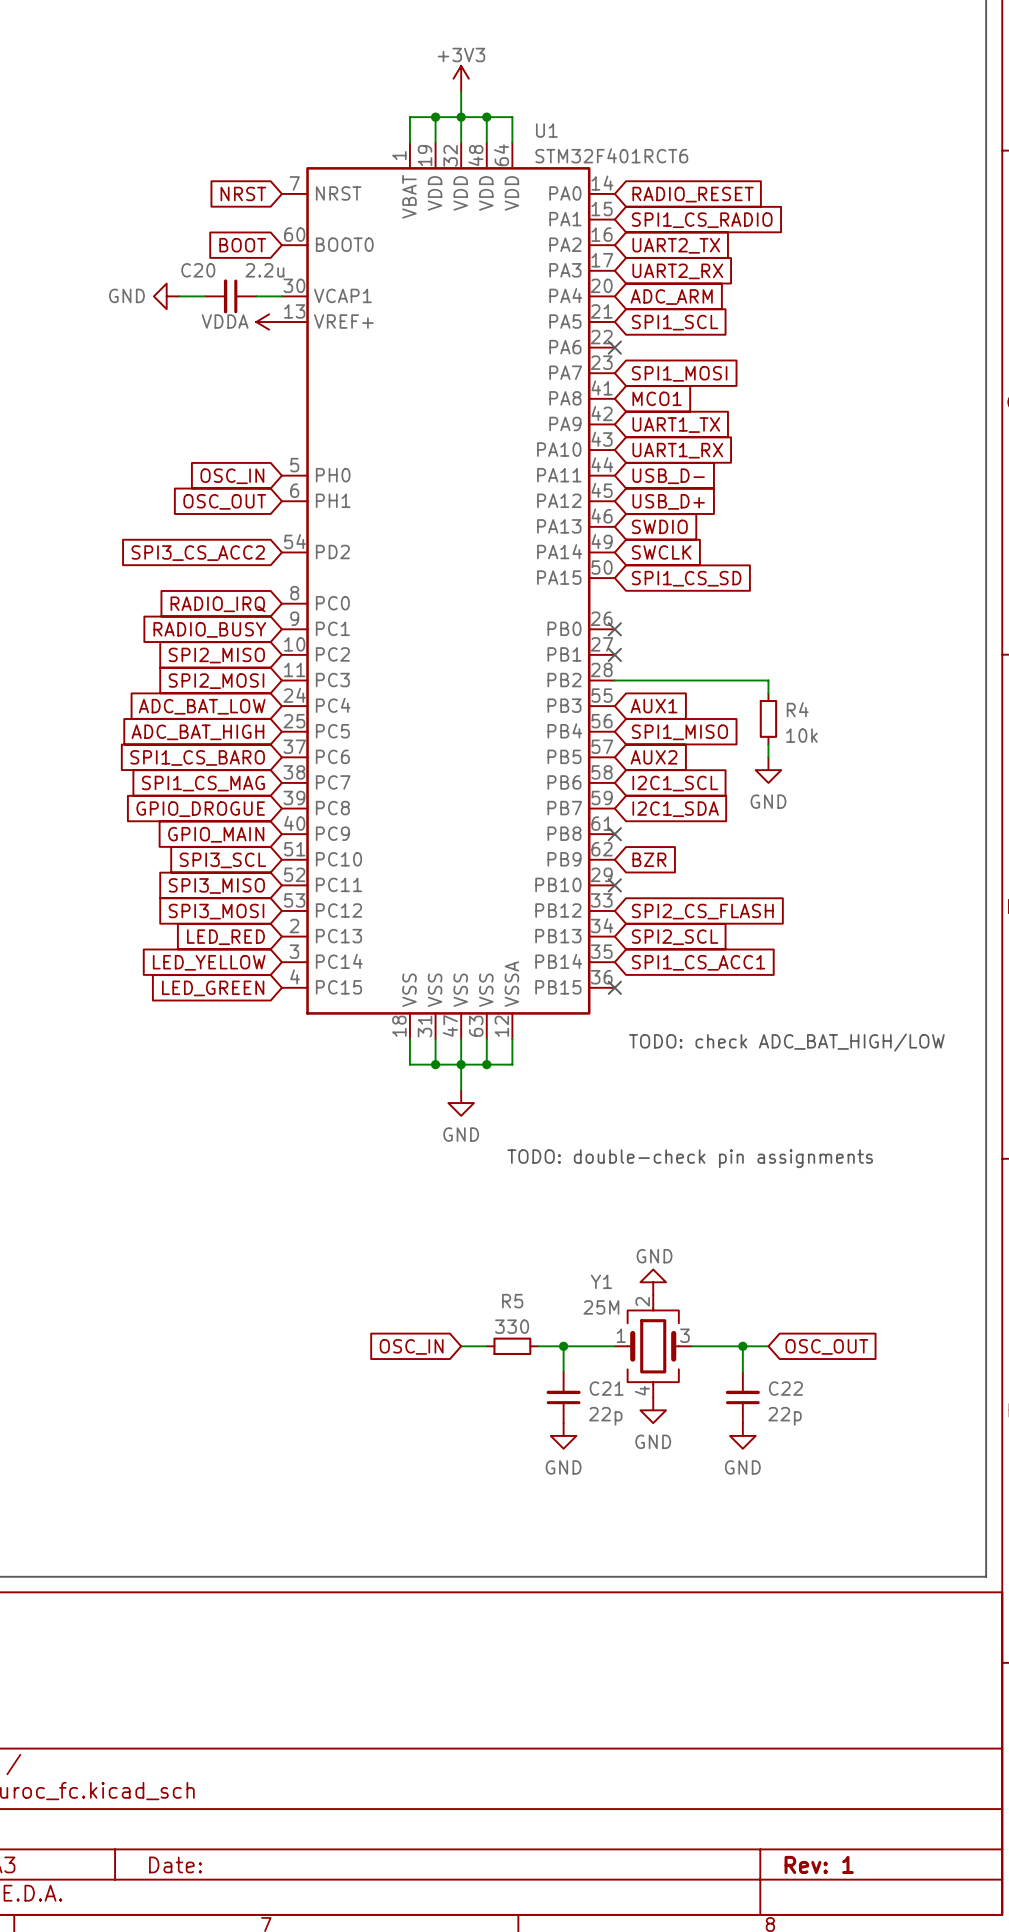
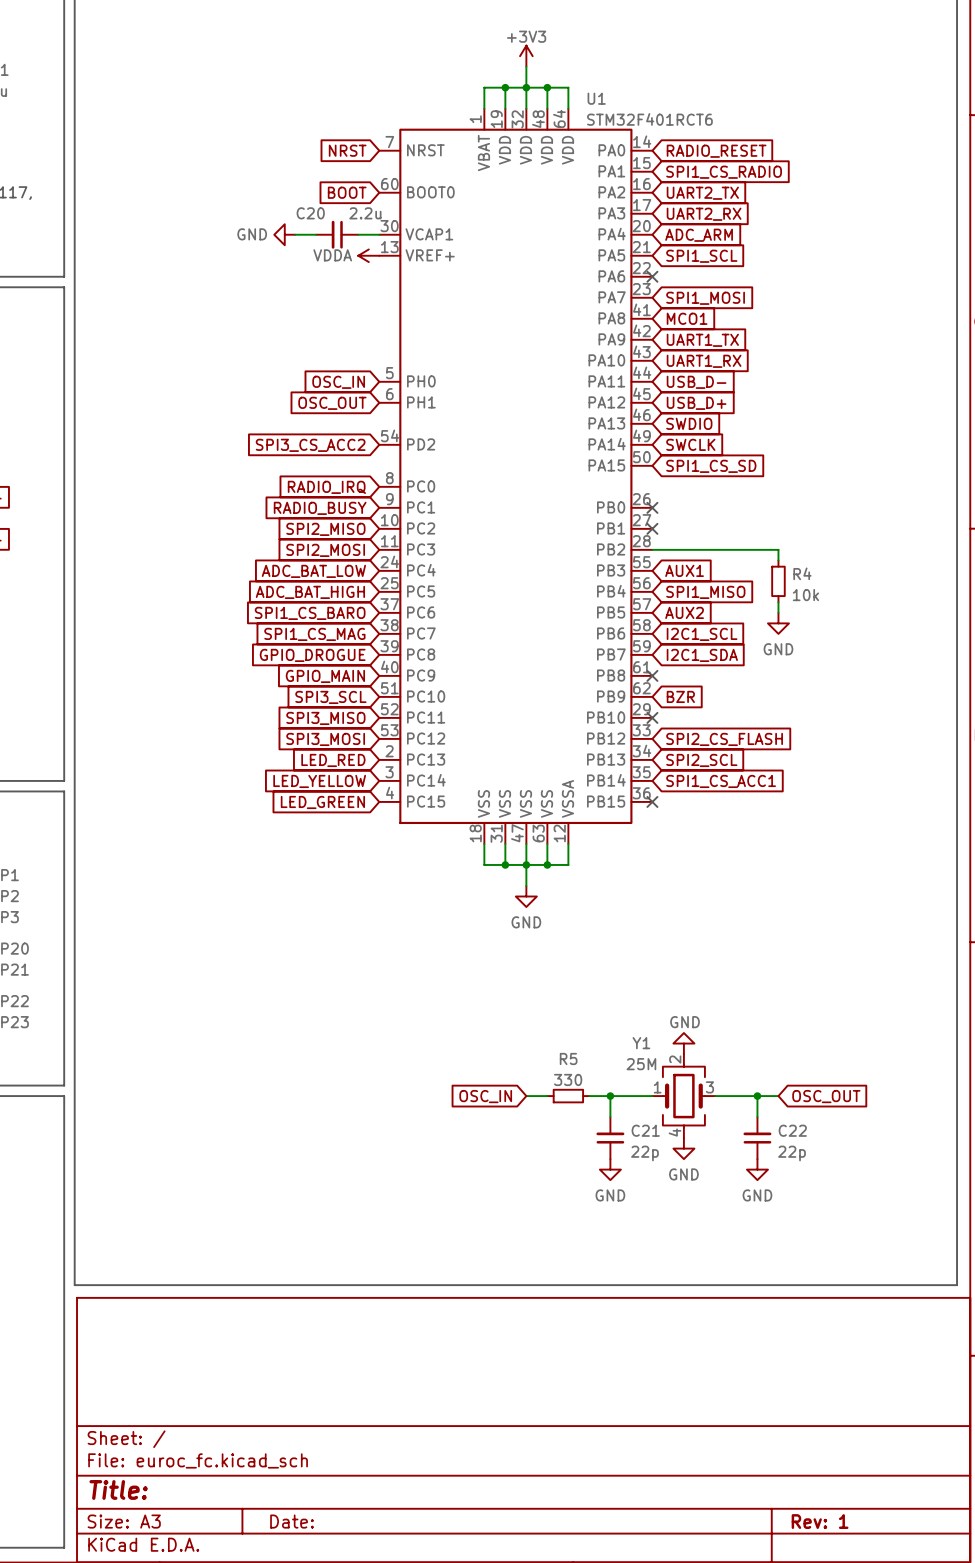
text: TODO: check ADC_BAT_HIGH/LOW (786, 1042) -> none
text: TODO: double-check pin assignments (690, 1158) -> none

